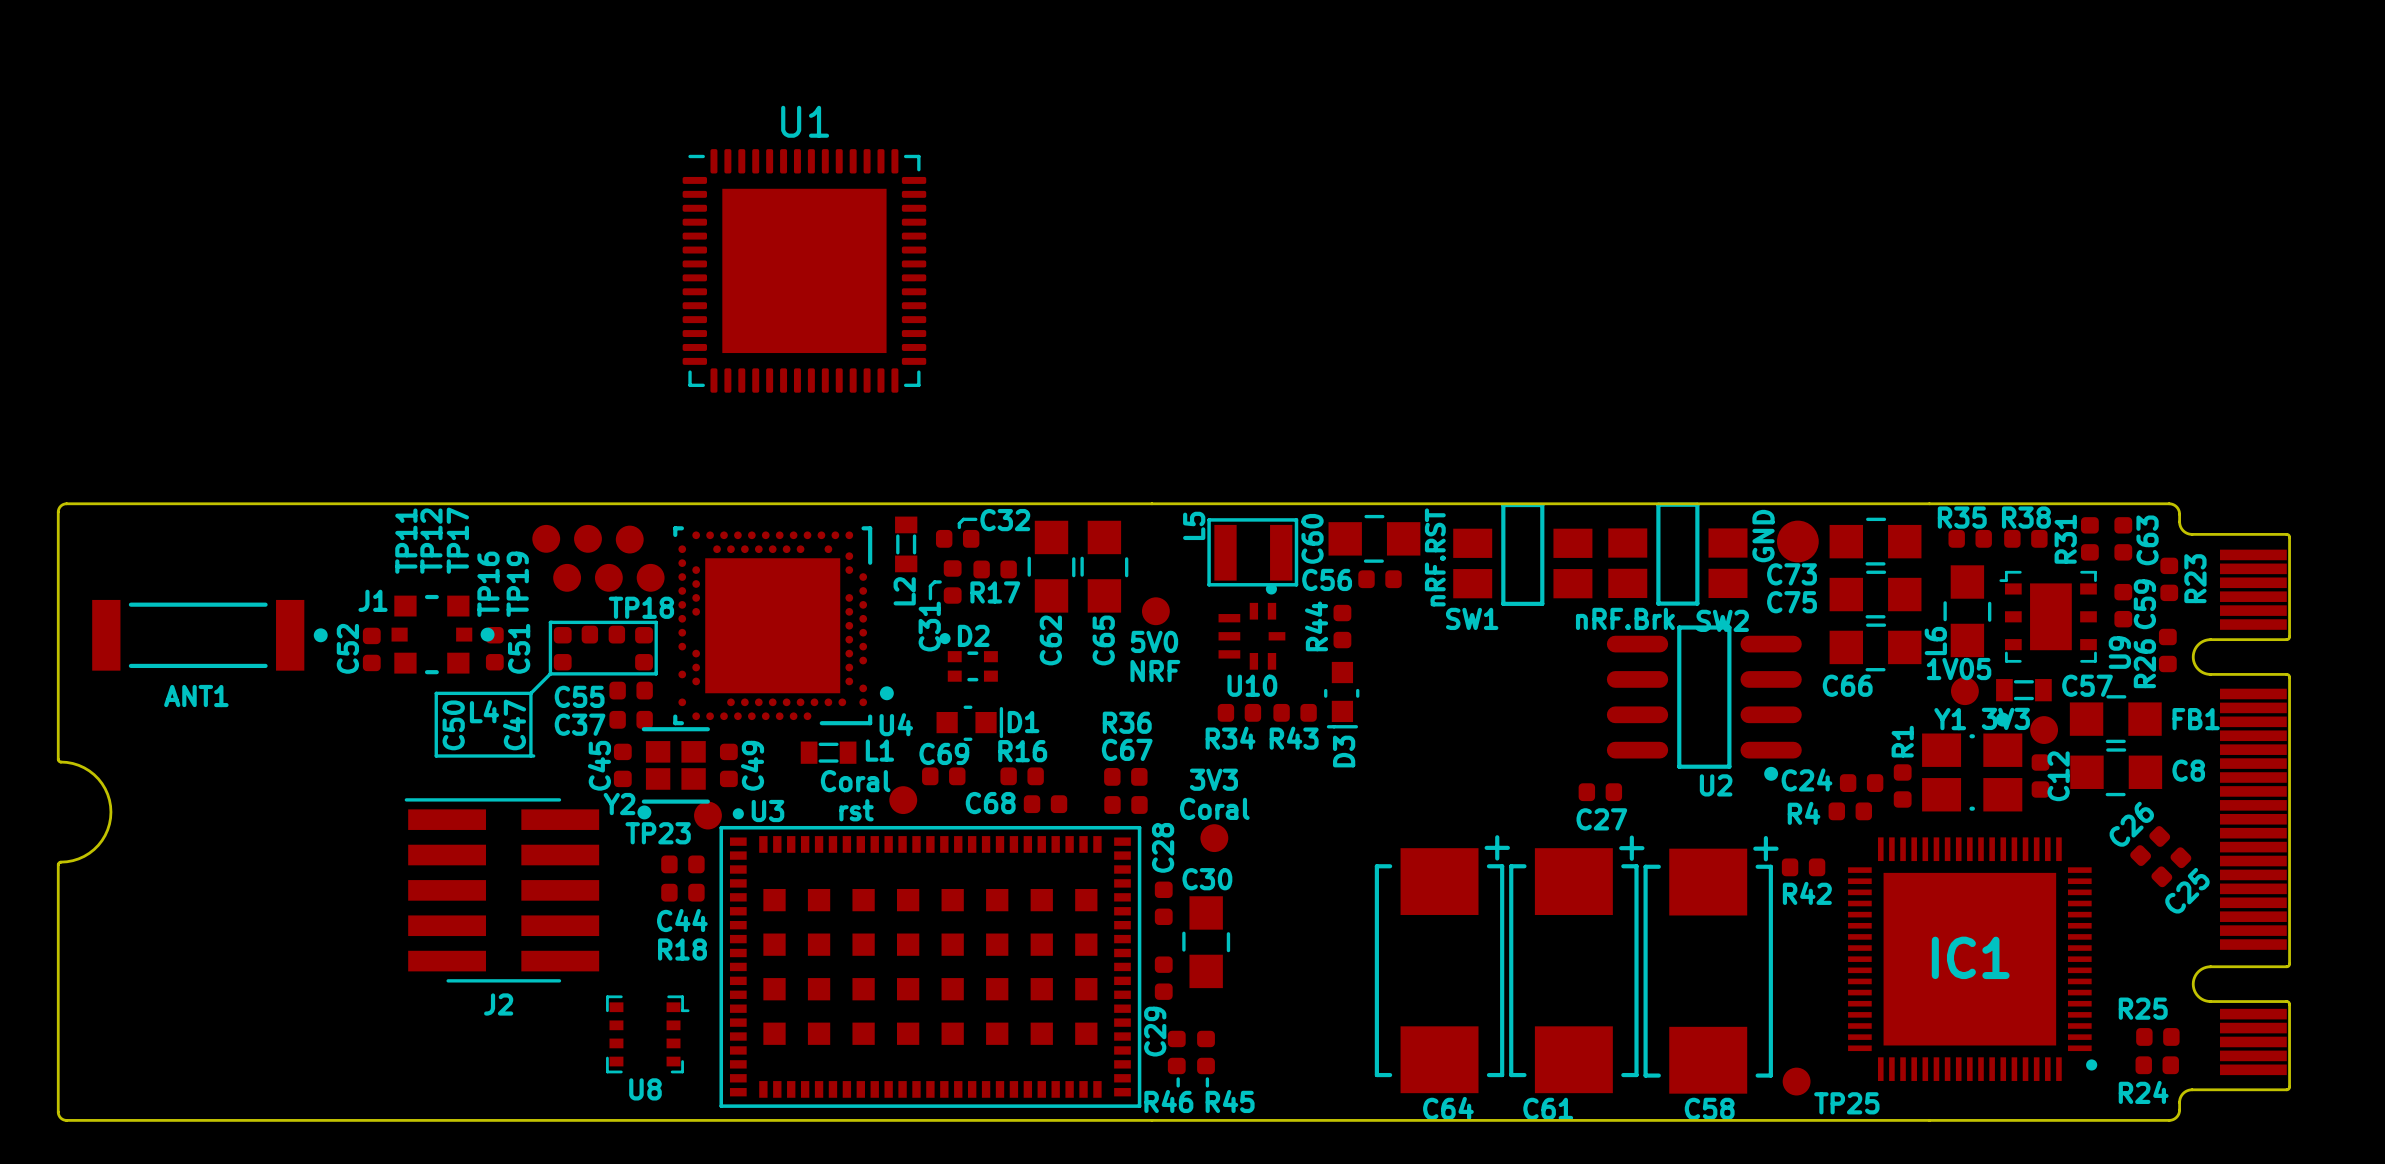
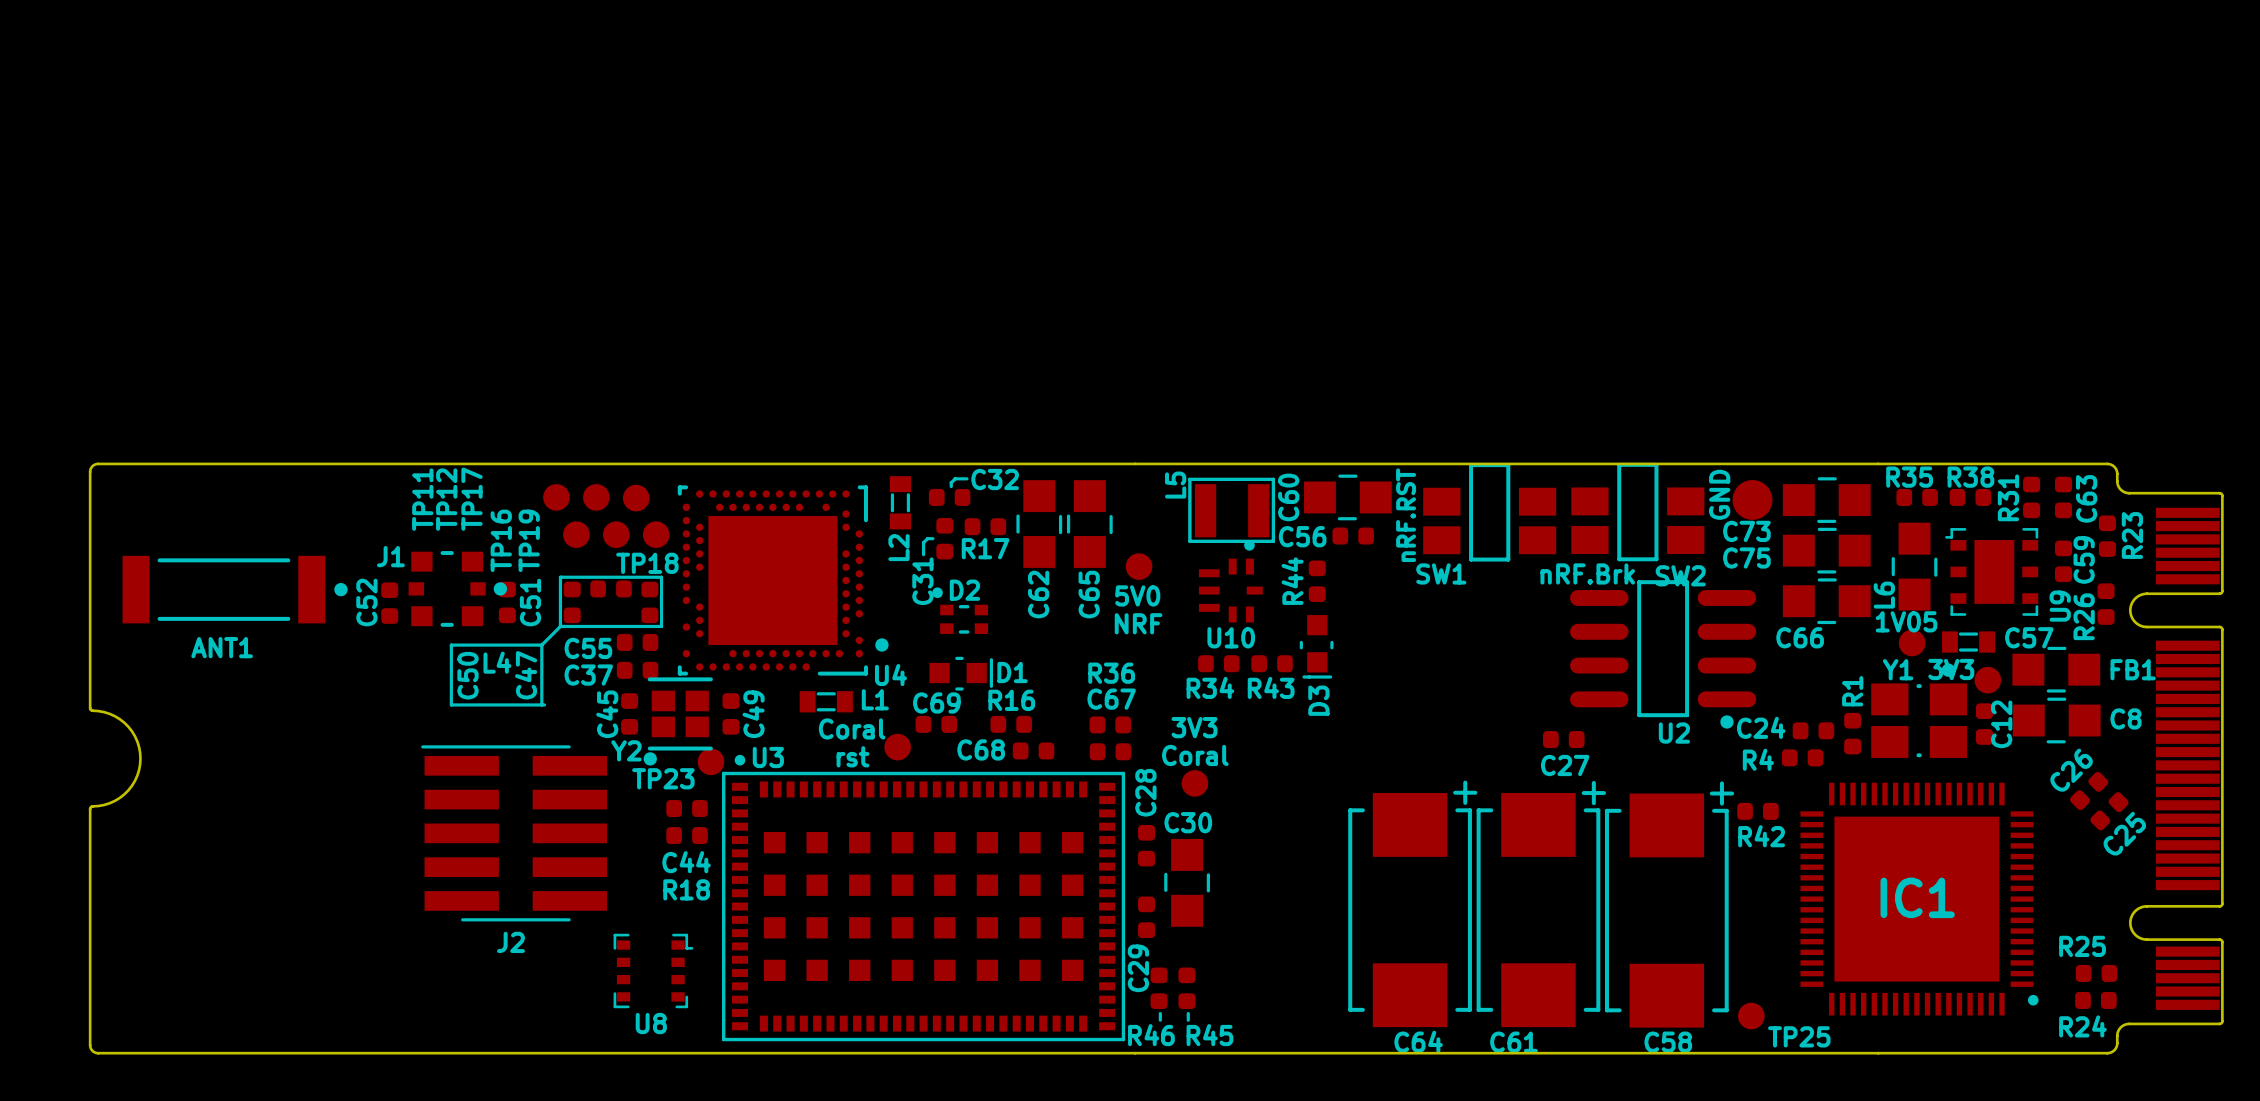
U1: (804, 270) -> none

